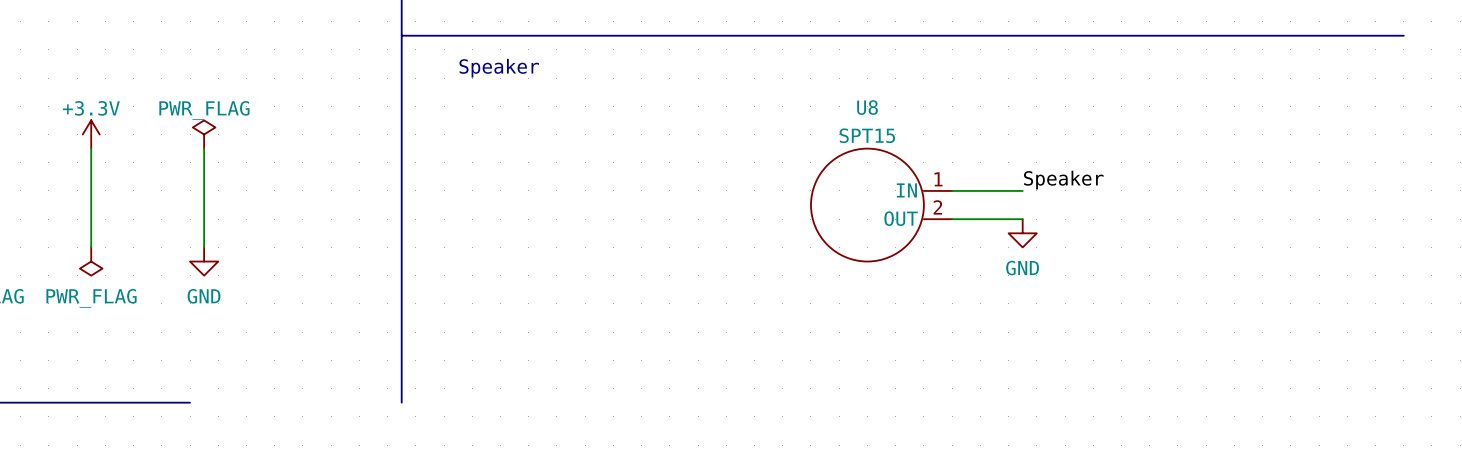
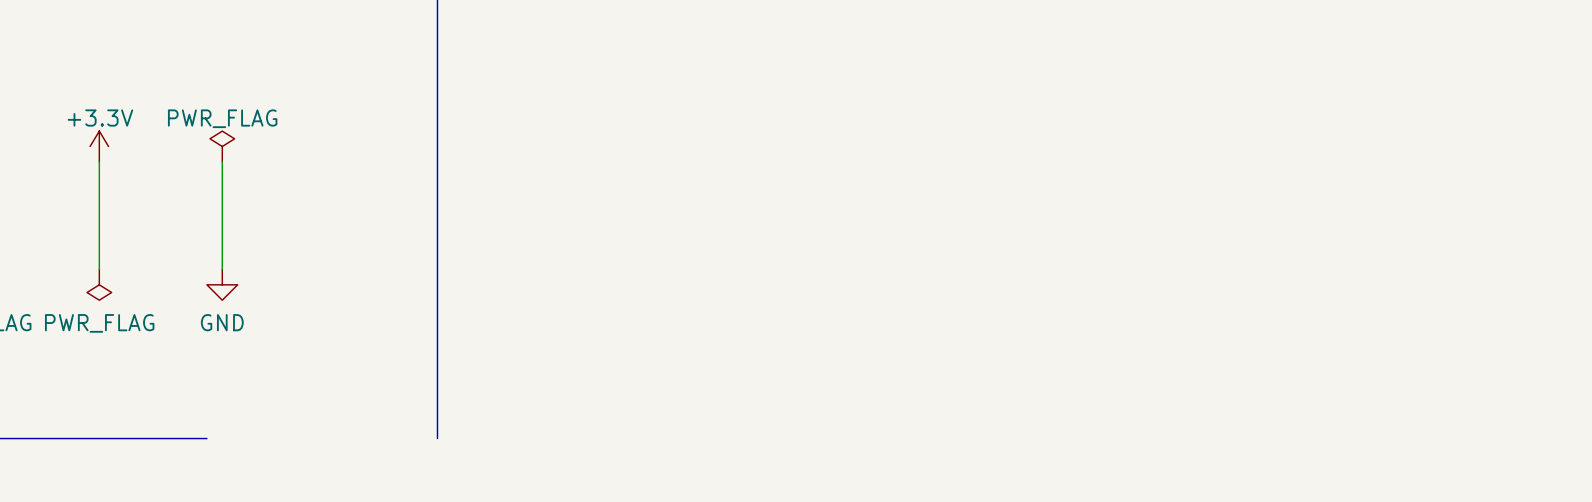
line: (401, 35) (1403, 35) -> none
text: Speaker (499, 68) -> none
label: Speaker (1063, 180) -> none
wire: (952, 190) (1022, 190) -> none
U8: SPT15 (881, 205) -> none
wire: (952, 219) (1022, 219) -> none
power symbol: GND (1022, 233) -> none

